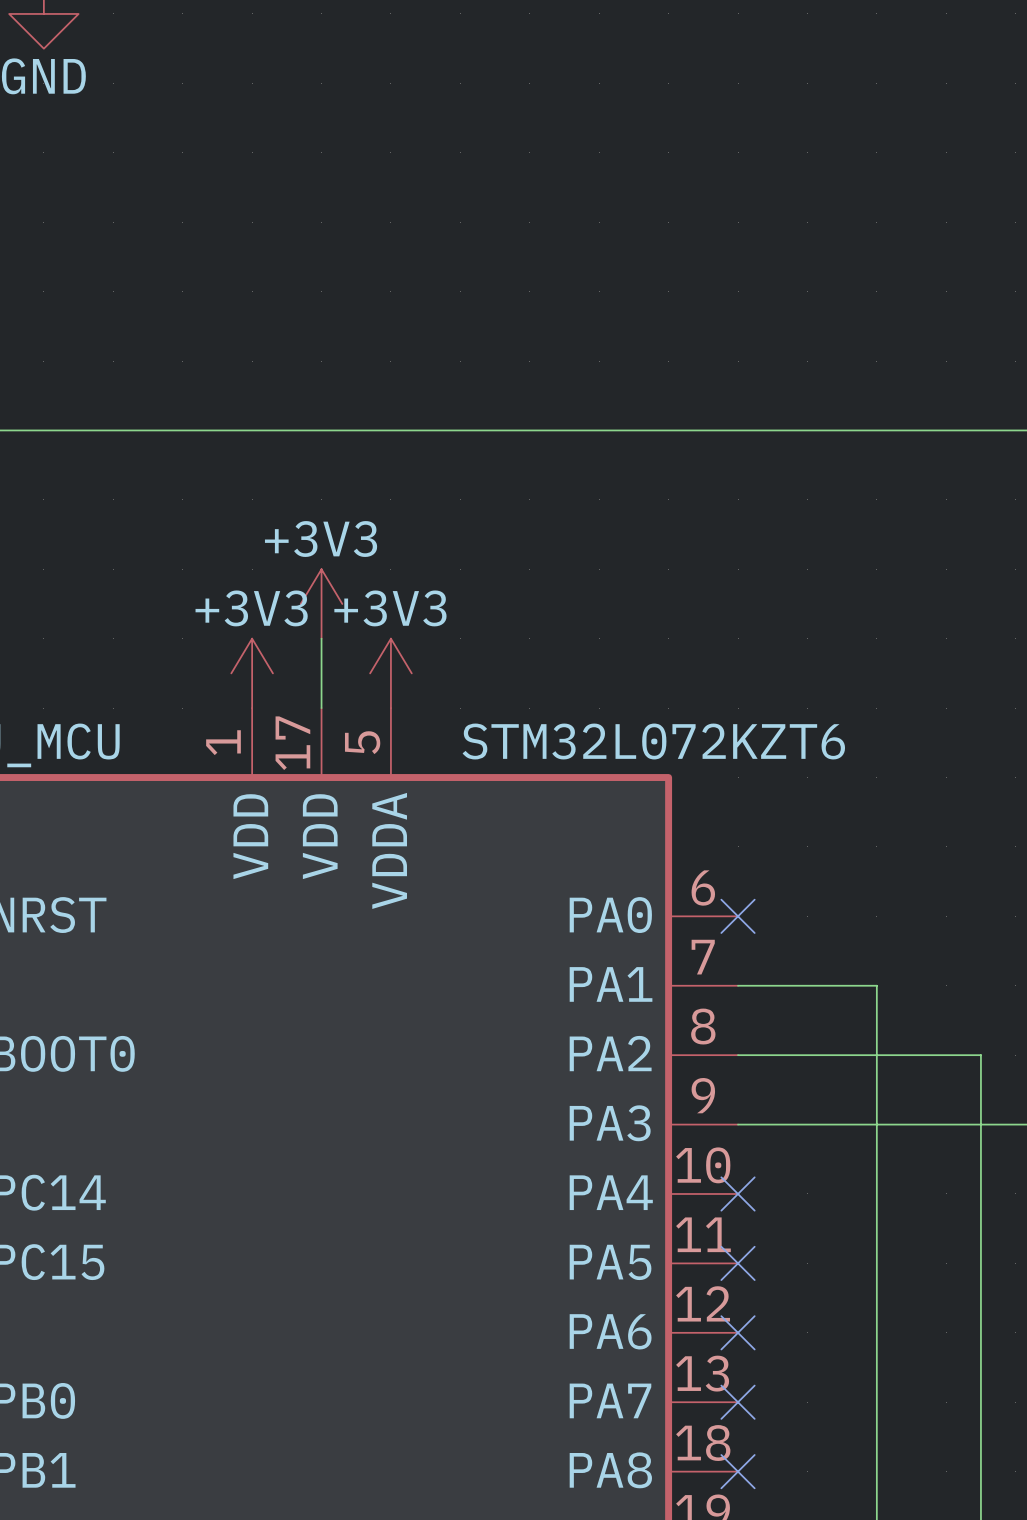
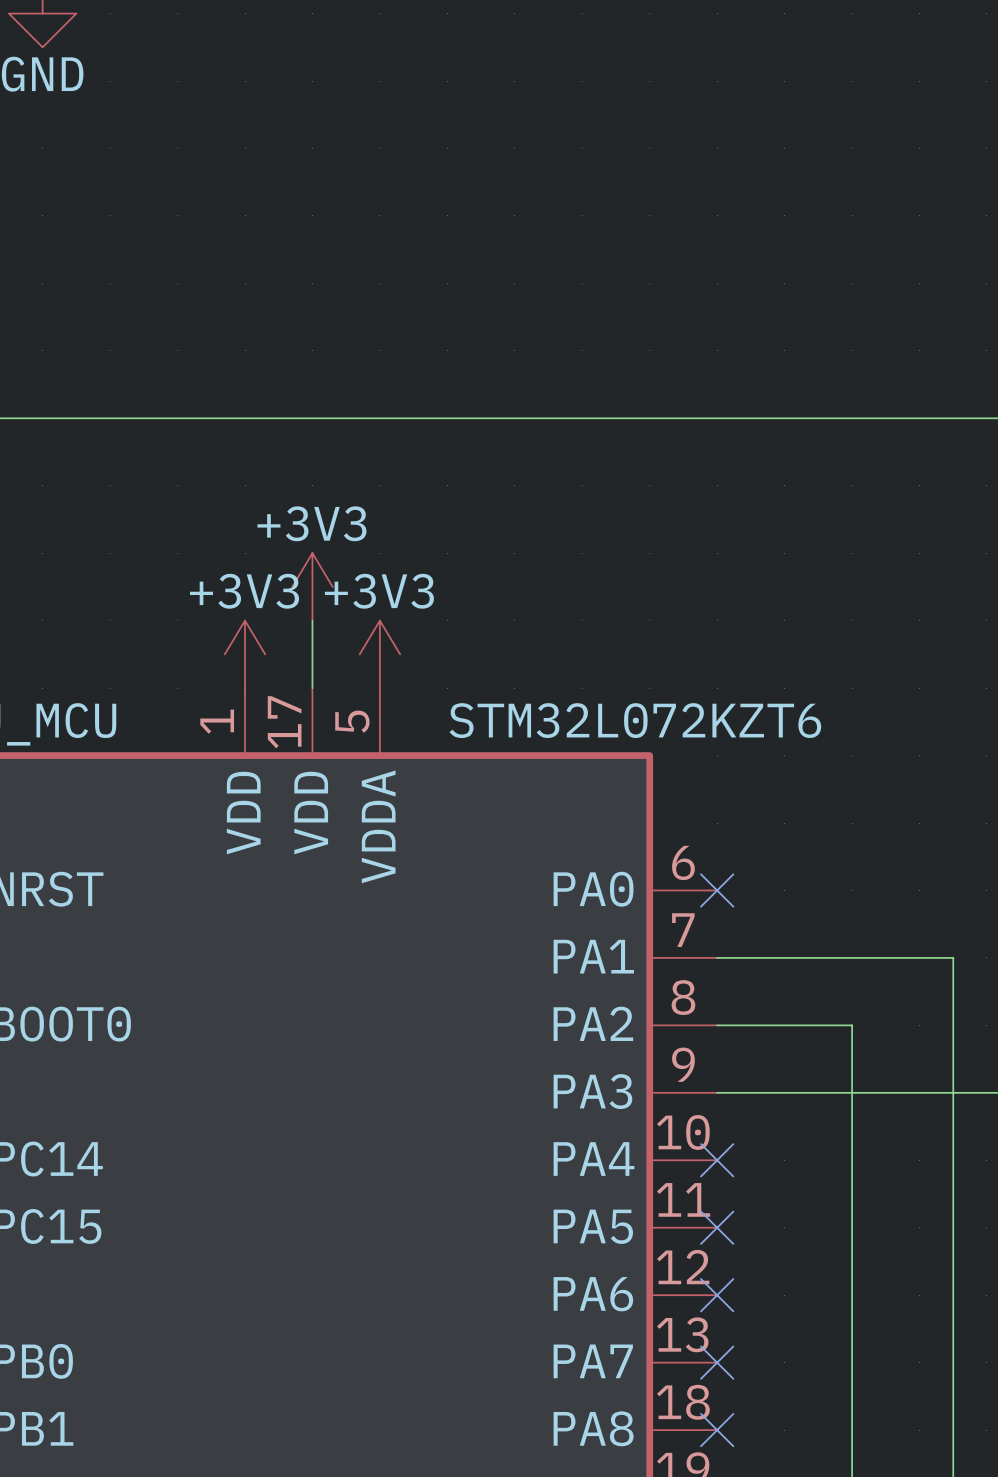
wire: (876, 985) (876, 1055) (980, 1055) -> (852, 957) (953, 957) (953, 1025)

